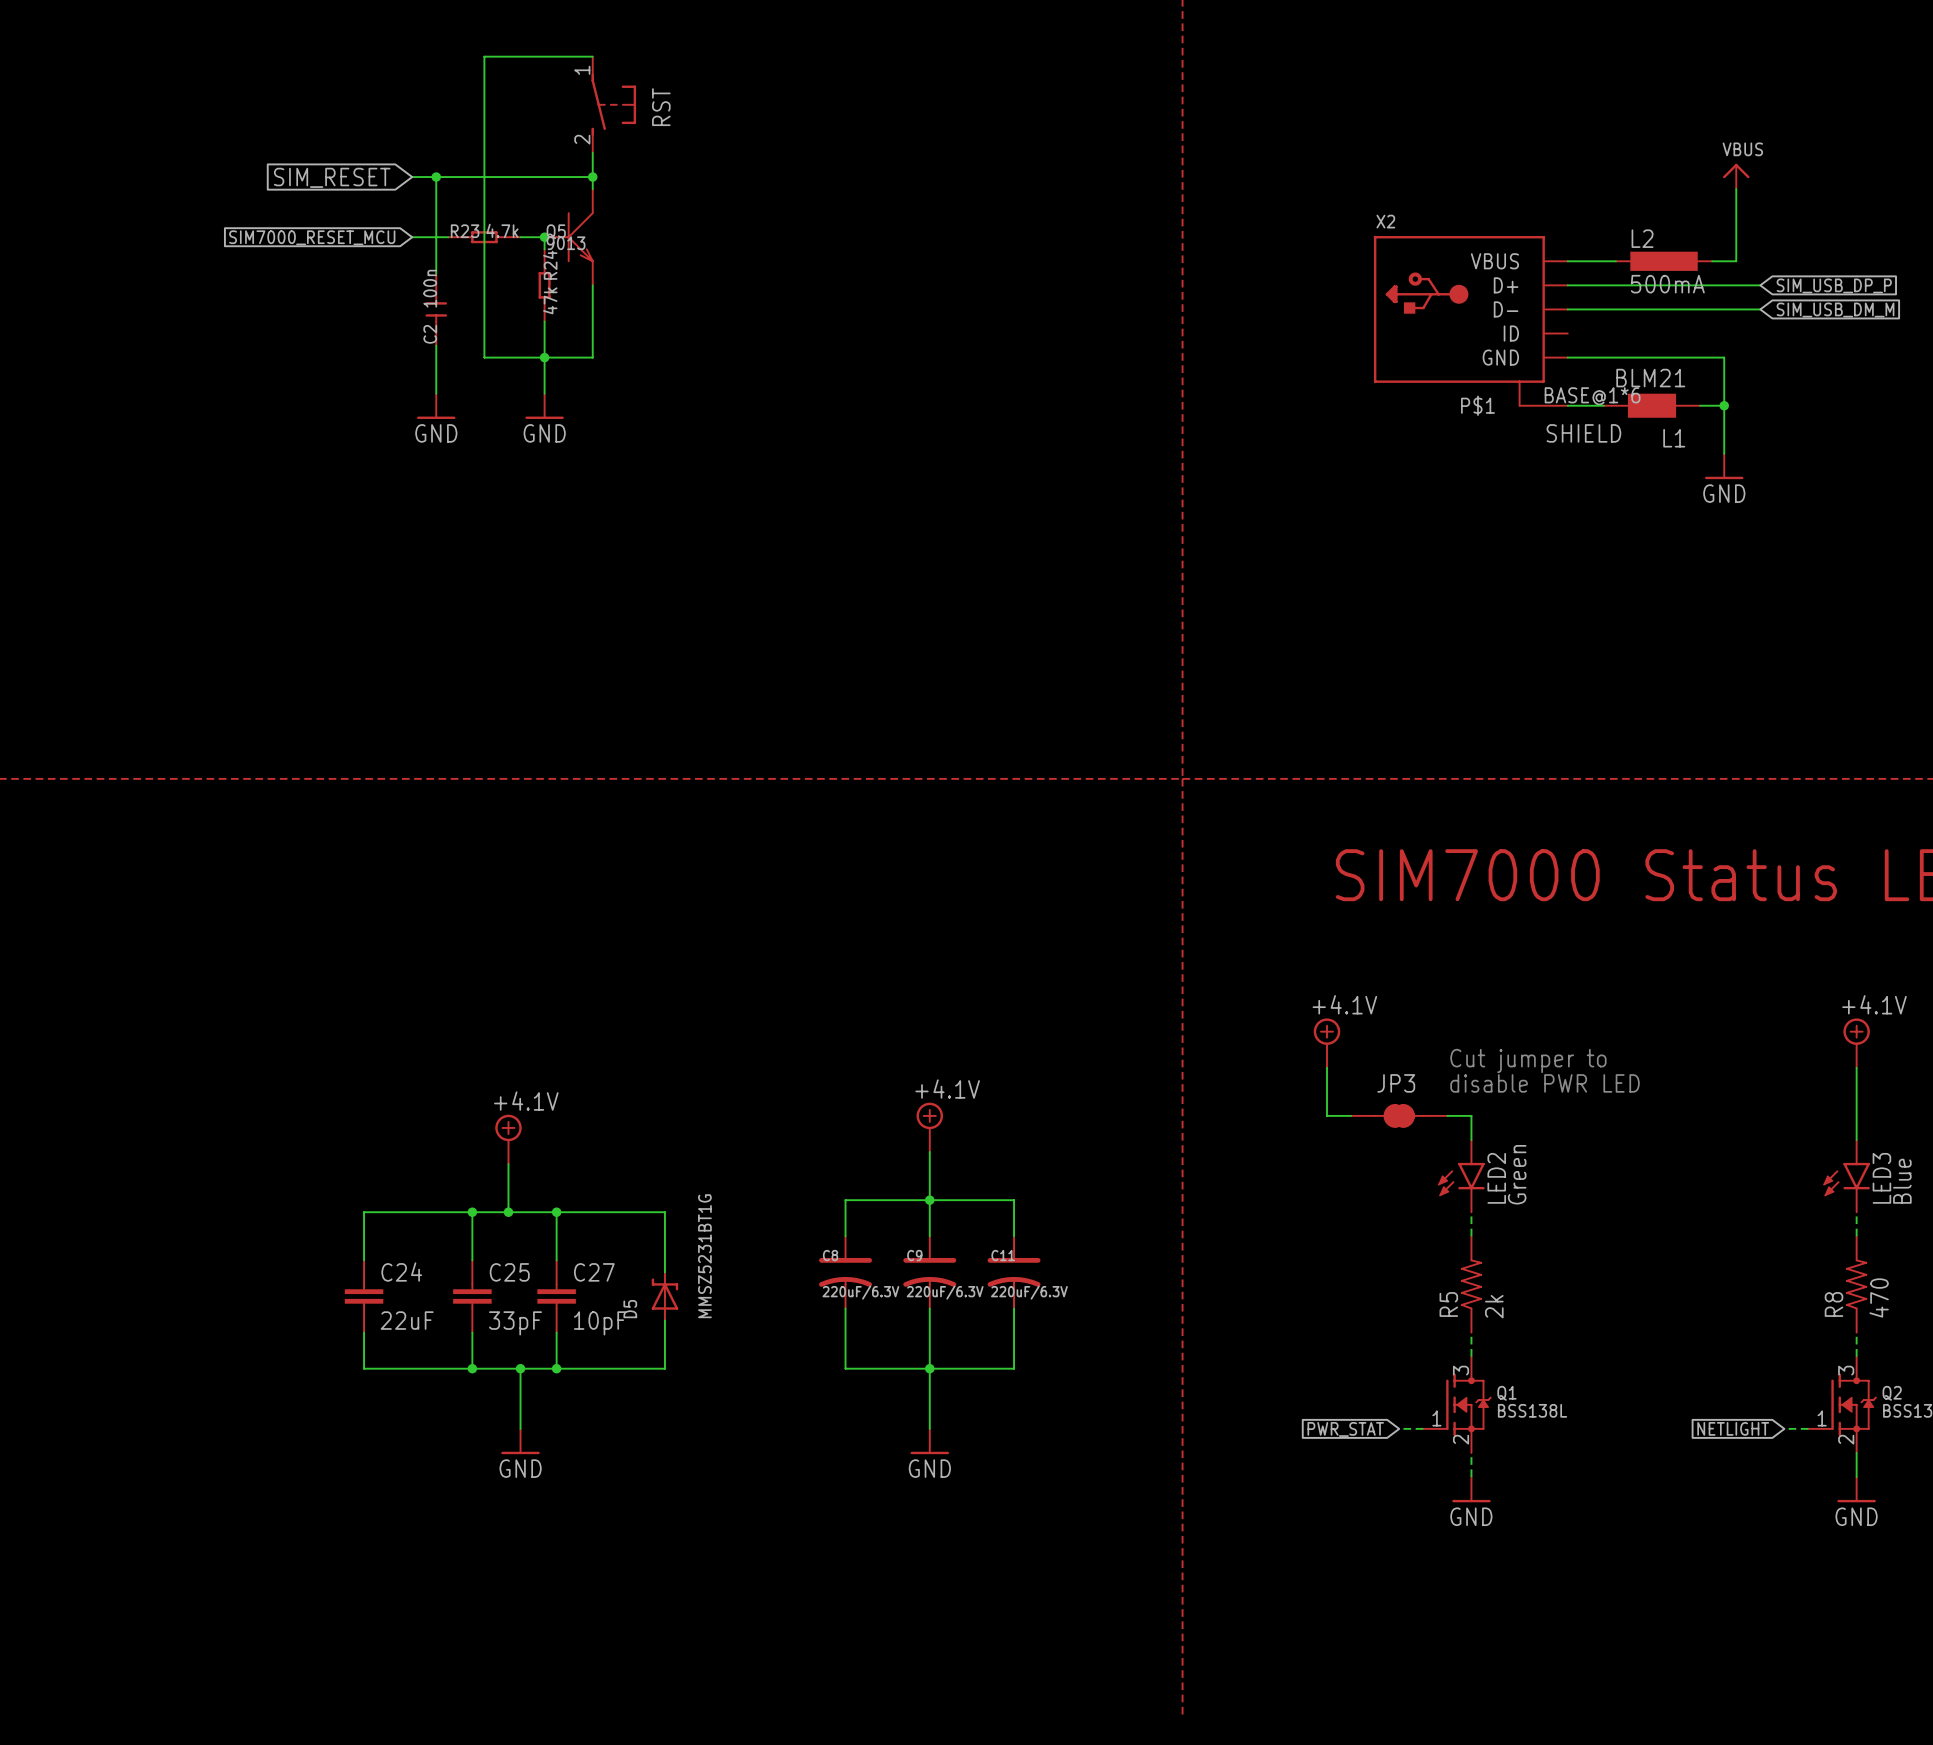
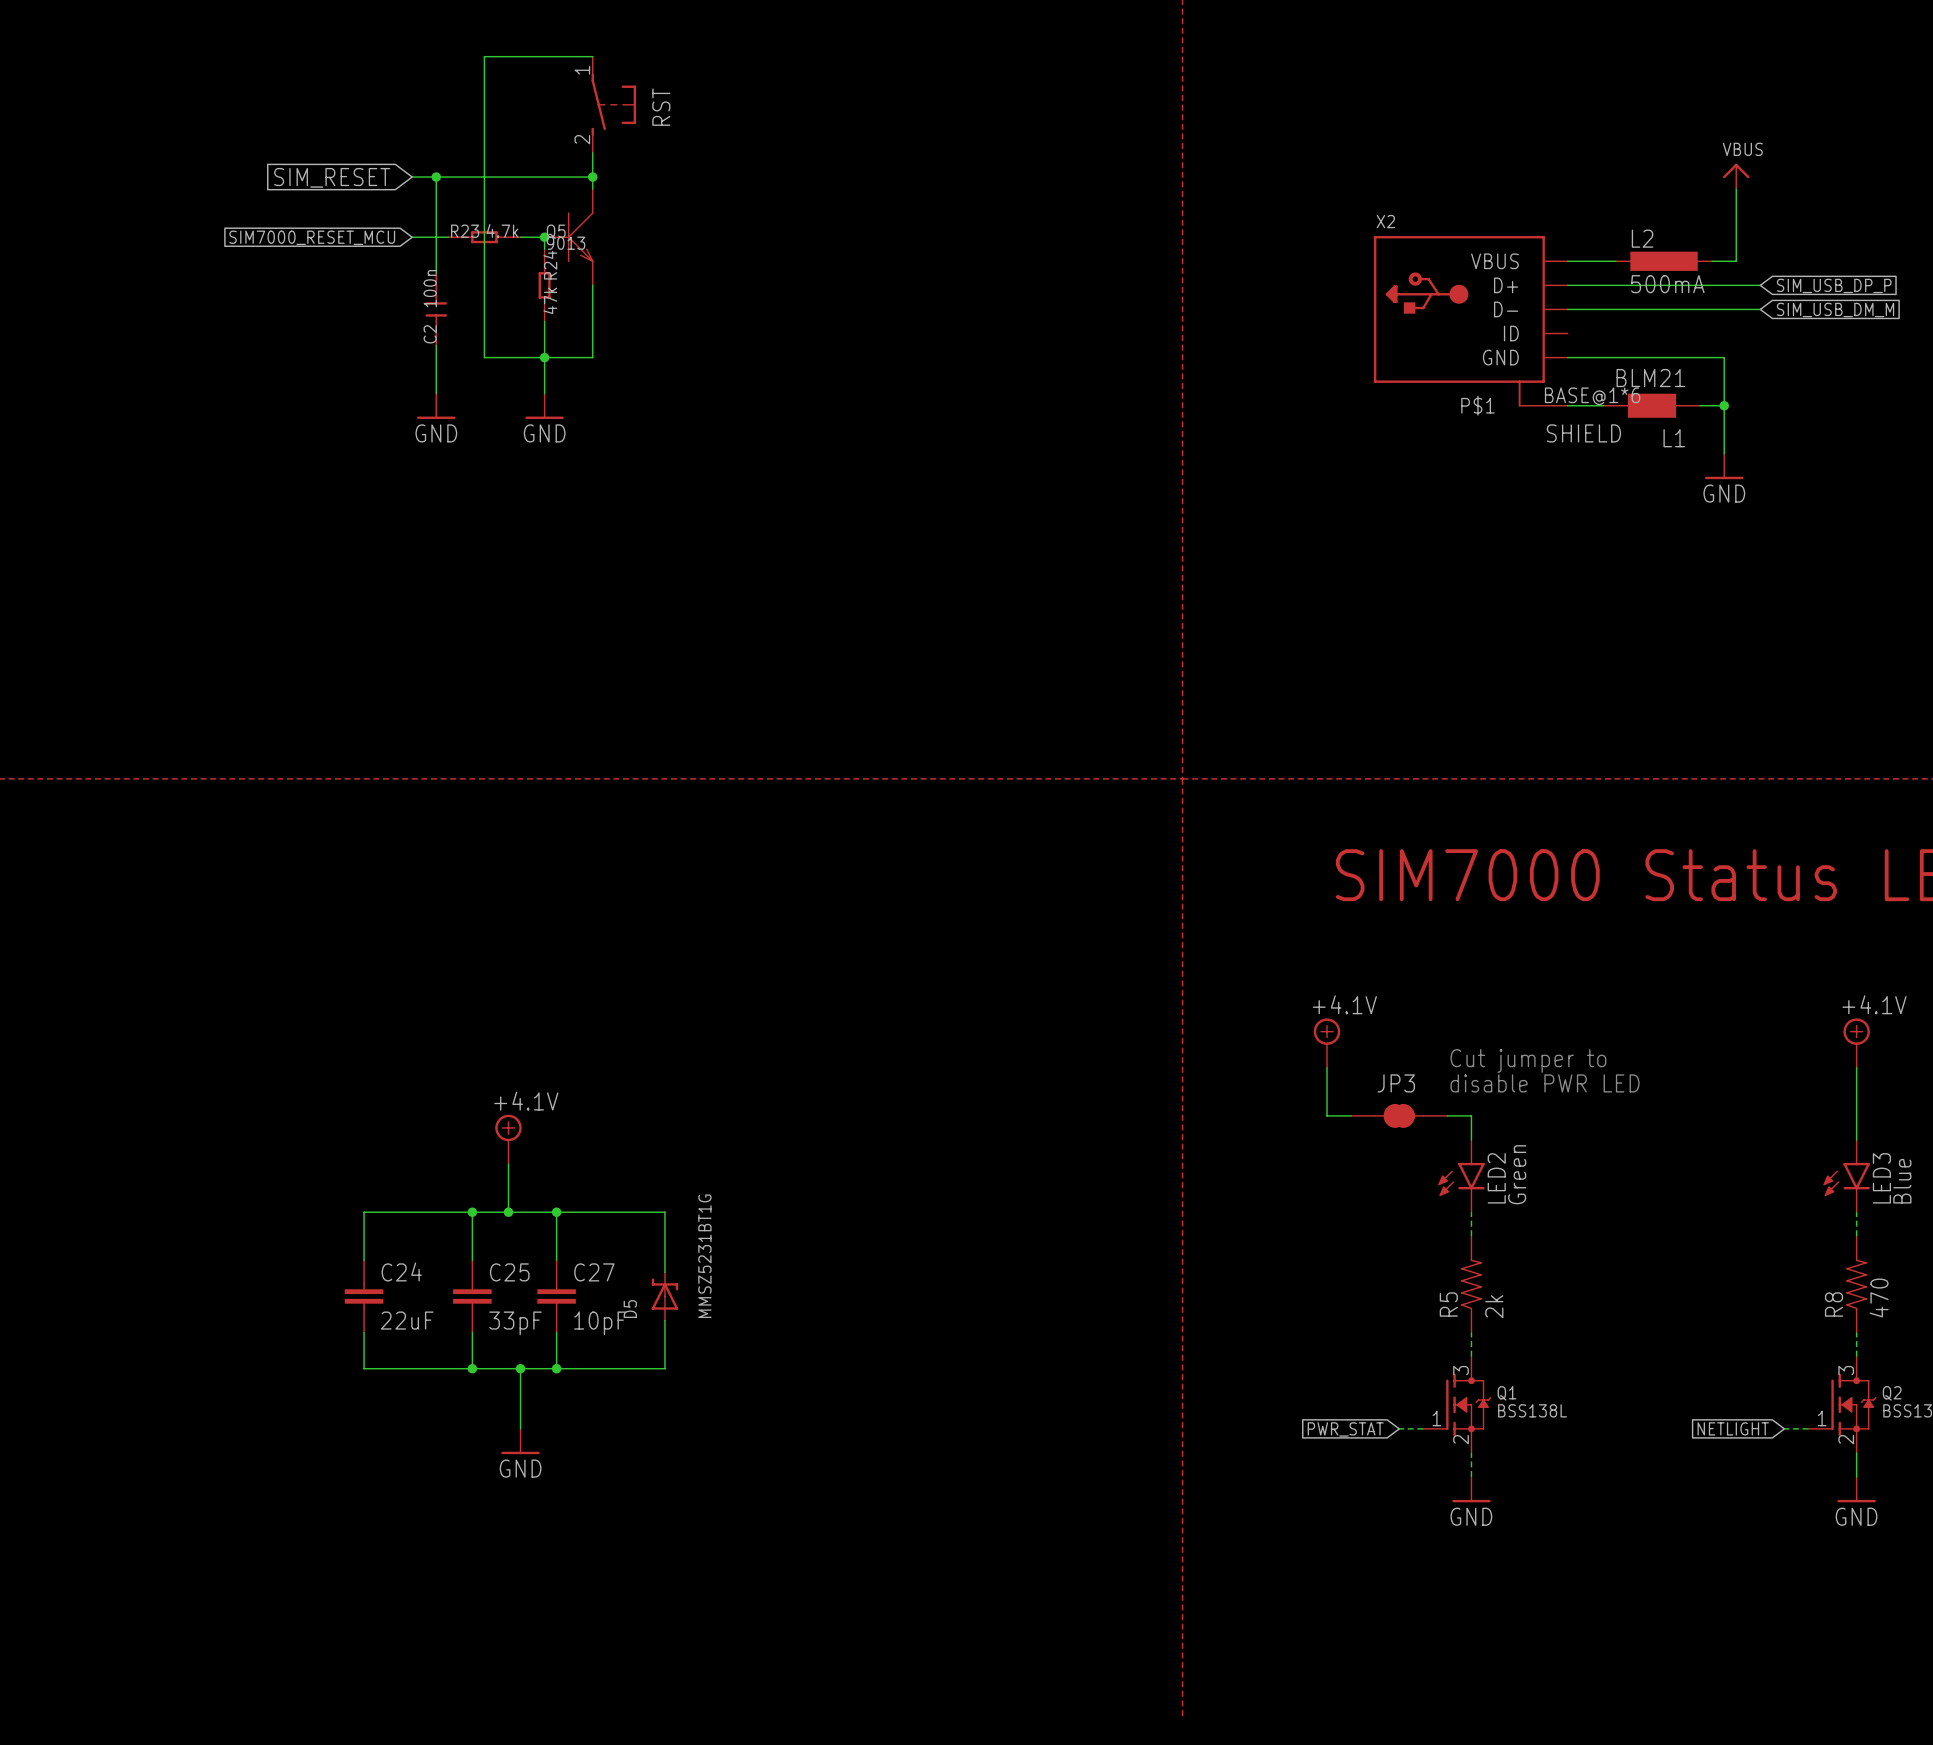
power symbol: +4.1V (929, 1127) -> none
wire: (929, 1152) (929, 1236) -> none
junction: (929, 1200) -> none
wire: (845, 1236) (845, 1200) (1014, 1200) (1014, 1236) -> none
C8: 220uF/6.3V (845, 1272) -> none
C9: 220uF/6.3V (929, 1272) -> none
C11: 220uF/6.3V (1014, 1272) -> none
wire: (845, 1308) (845, 1368) (1014, 1368) (1014, 1308) -> none
wire: (929, 1308) (929, 1428) -> none
junction: (929, 1368) -> none
power symbol: GND (929, 1441) -> none

